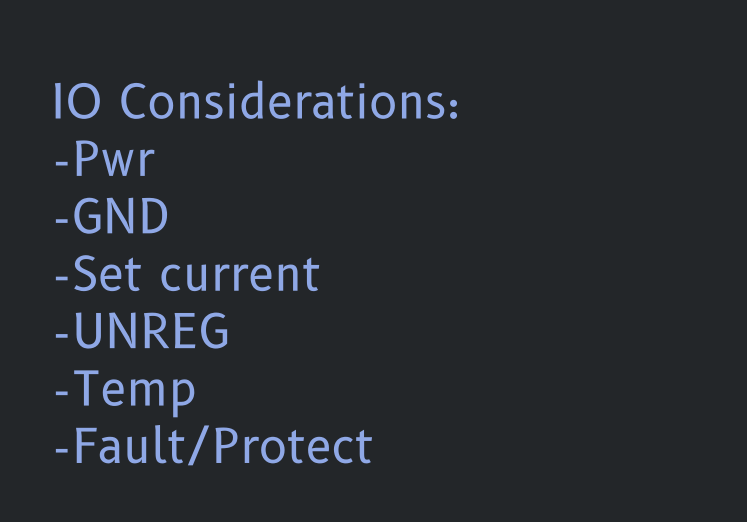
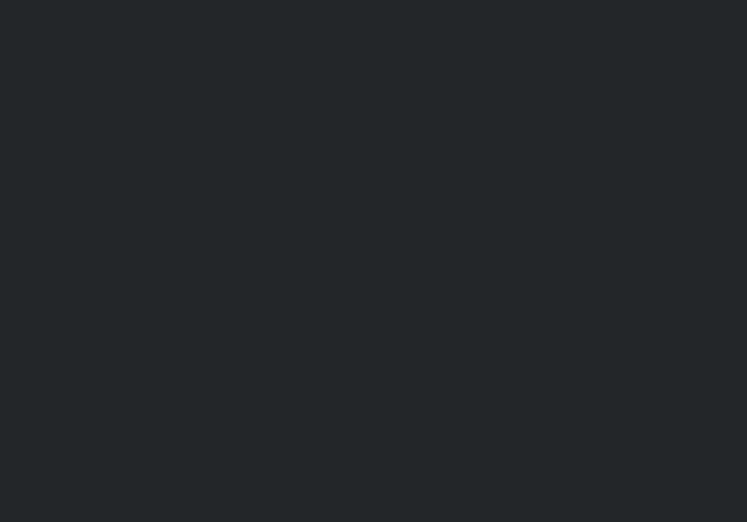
text: IO Considerations: (255, 99) -> none
text: -Pwr (105, 158) -> none
text: -GND (111, 215) -> none
text: -Set current (187, 273) -> none
text: -UNREG (141, 330) -> none
text: -Temp (125, 393) -> none
text: -Fault/Protect (213, 445) -> none

